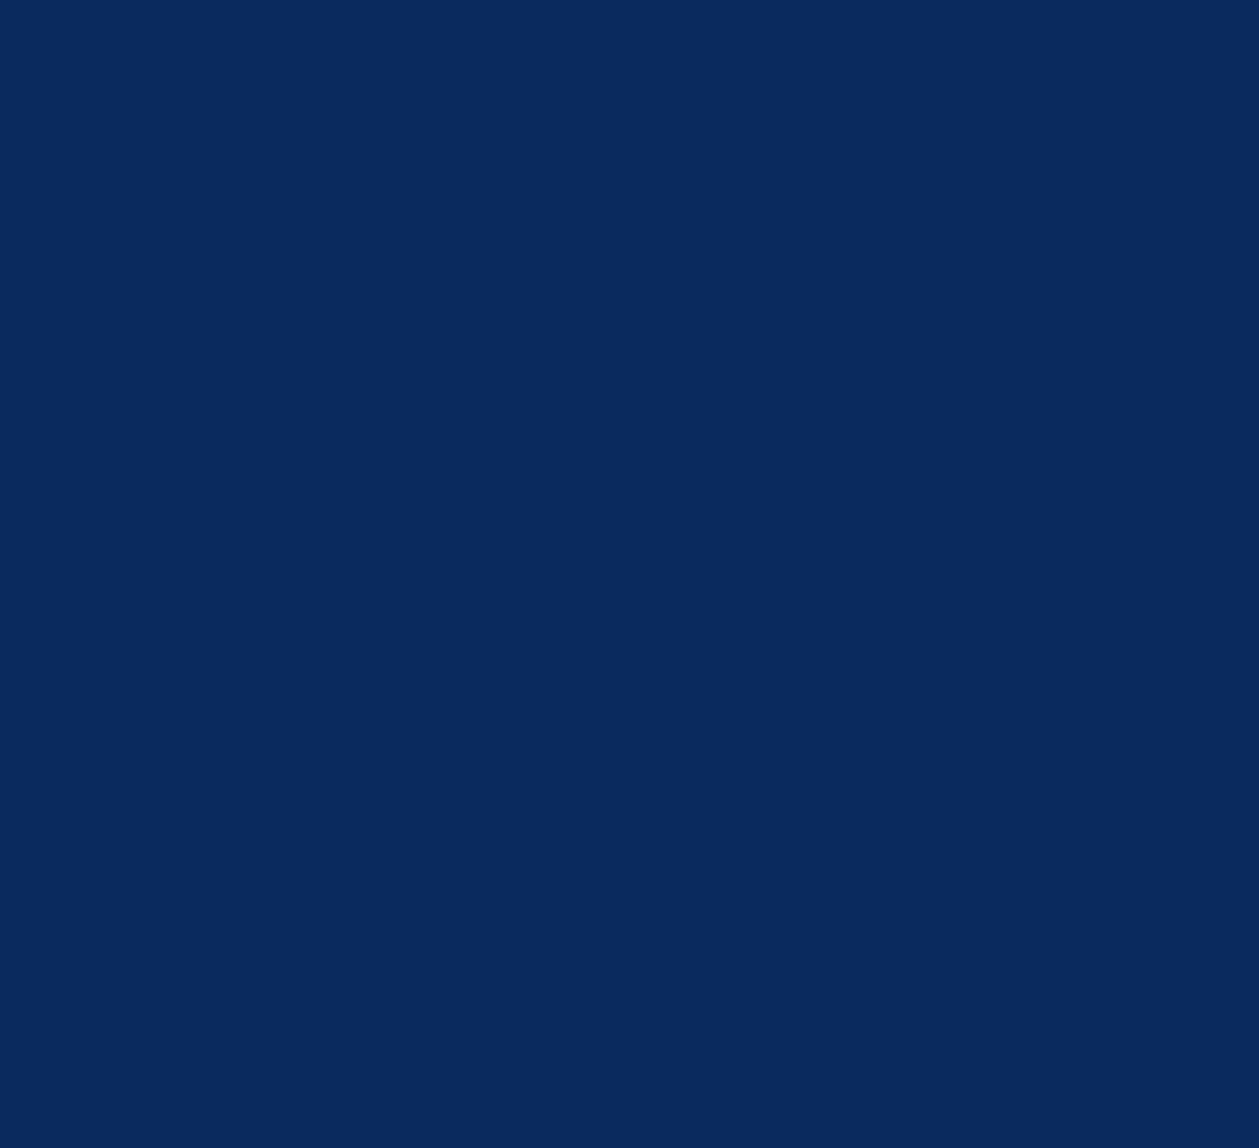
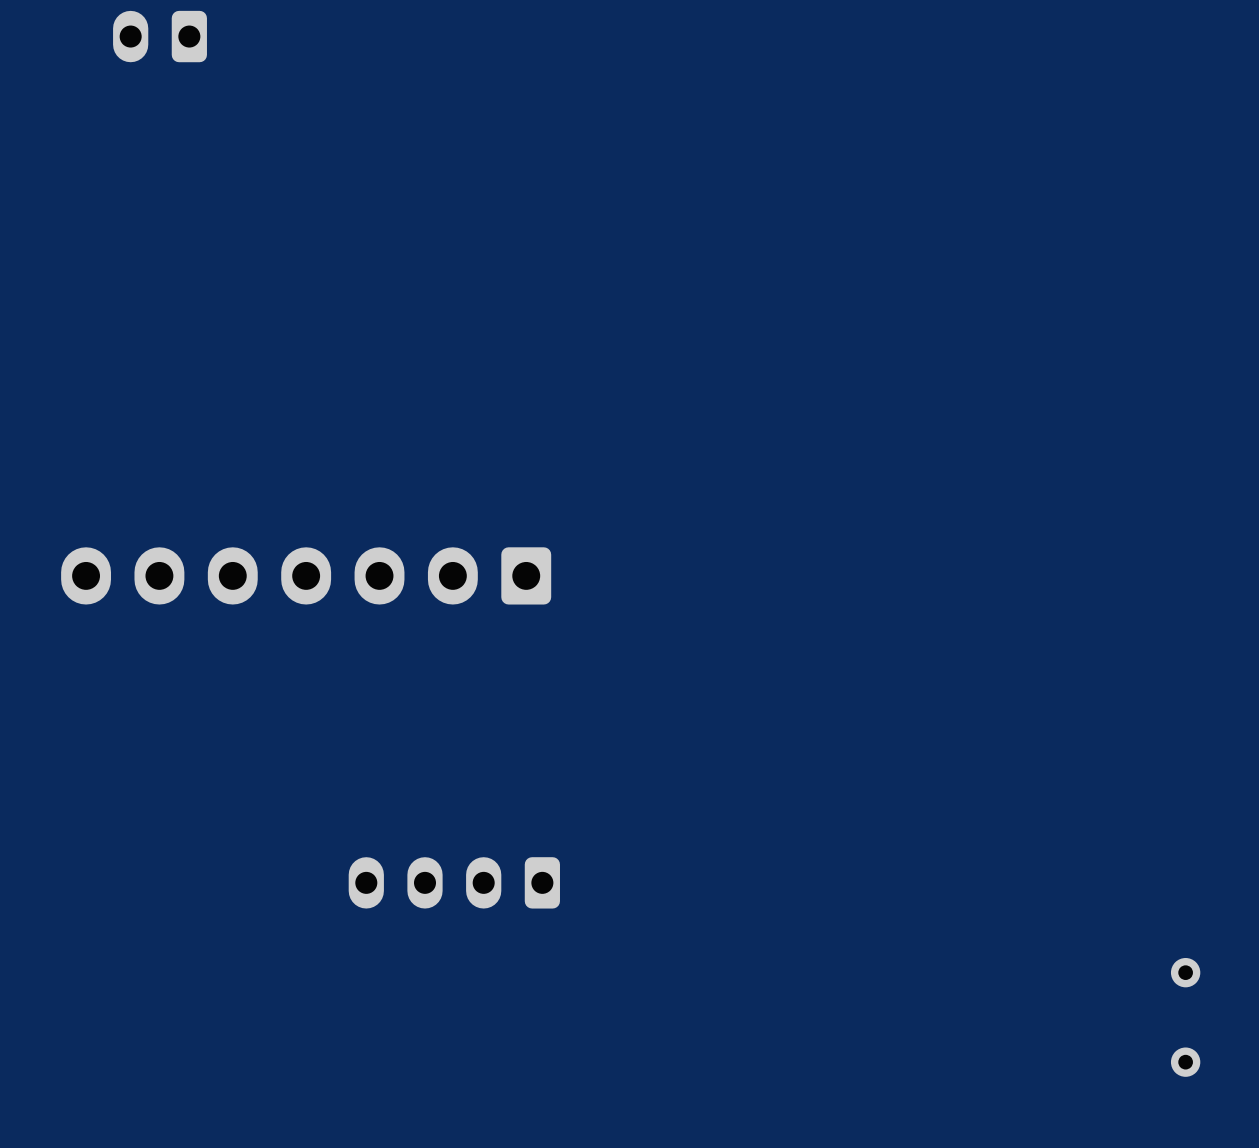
part: none -> (160, 36)
part: none -> (306, 575)
part: none -> (454, 882)
part: none -> (1185, 972)
part: none -> (1185, 1062)

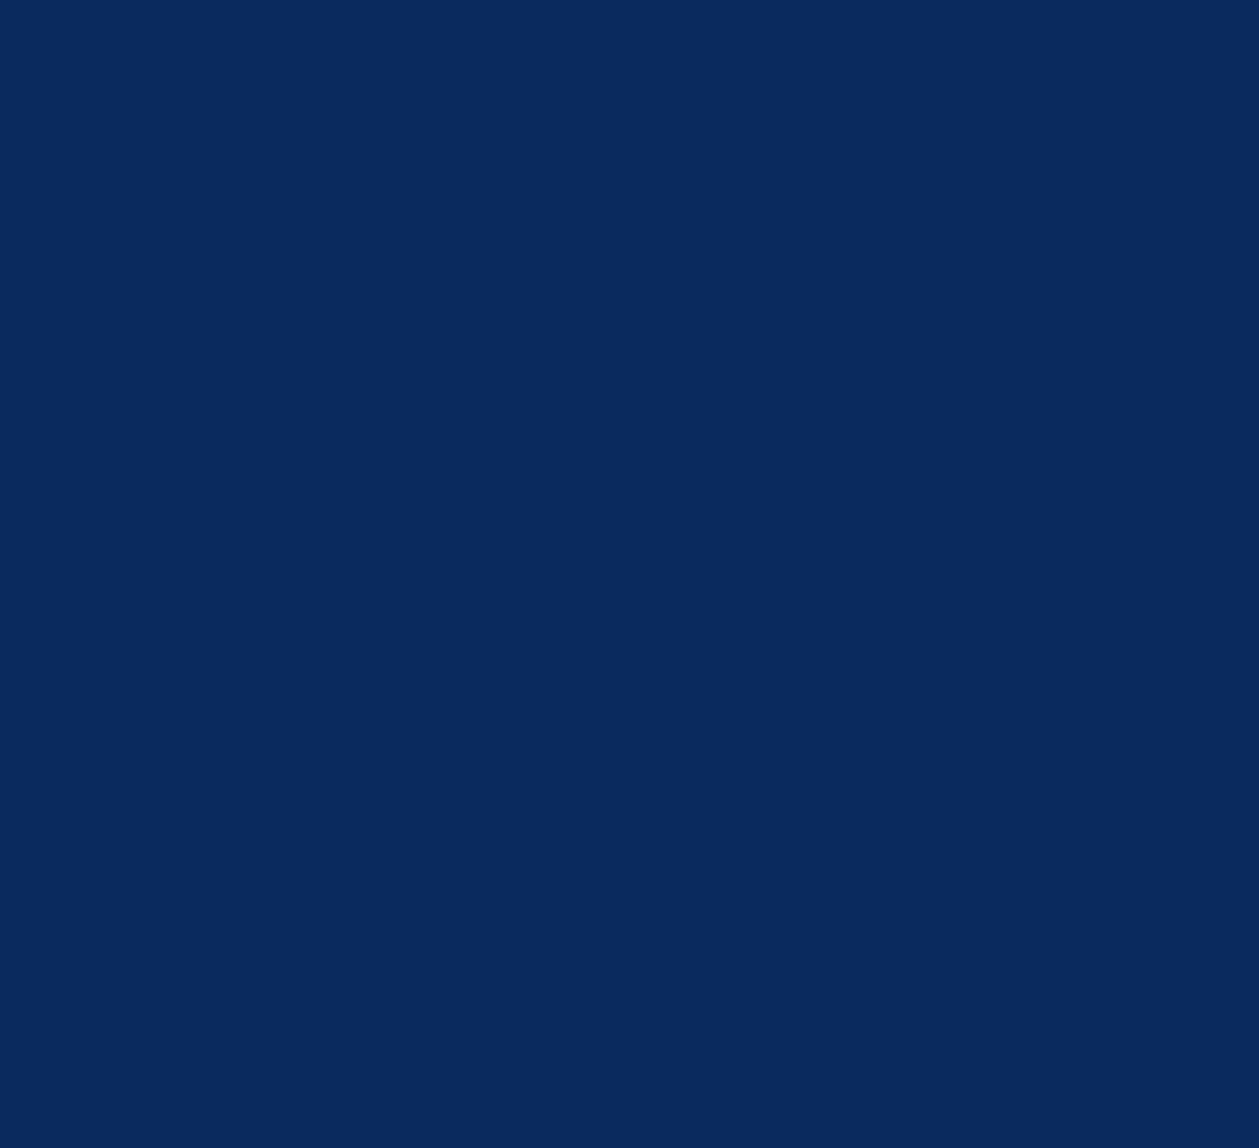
part: (160, 36) -> none
part: (306, 575) -> none
part: (454, 882) -> none
part: (1185, 972) -> none
part: (1185, 1062) -> none

